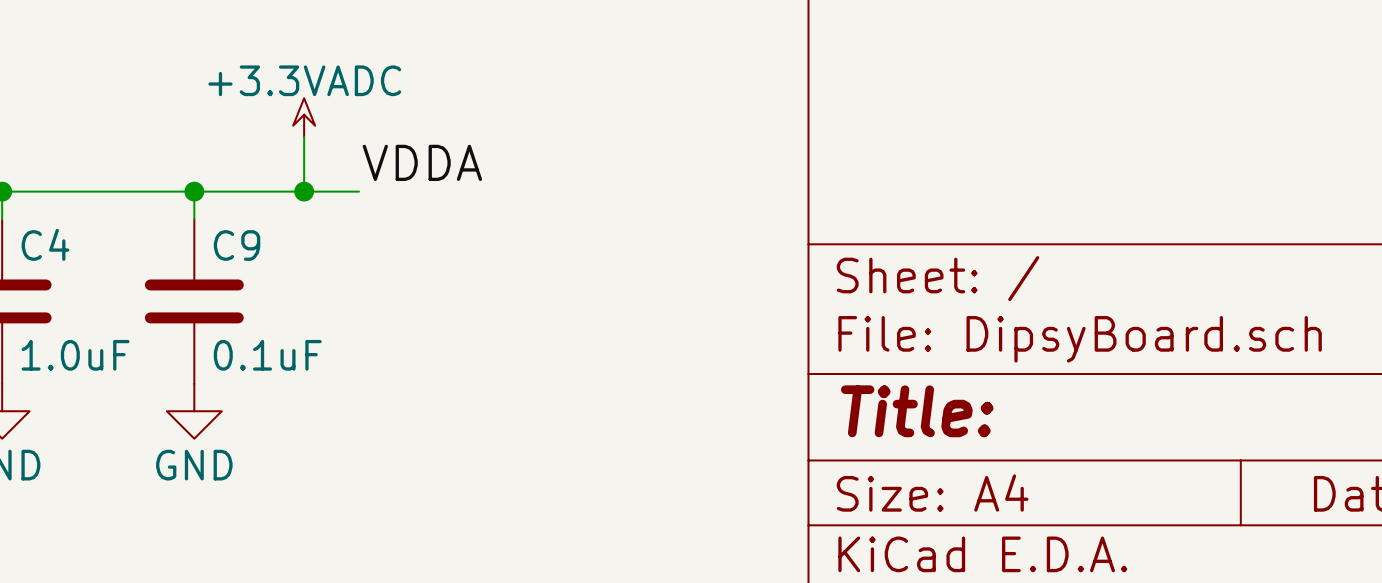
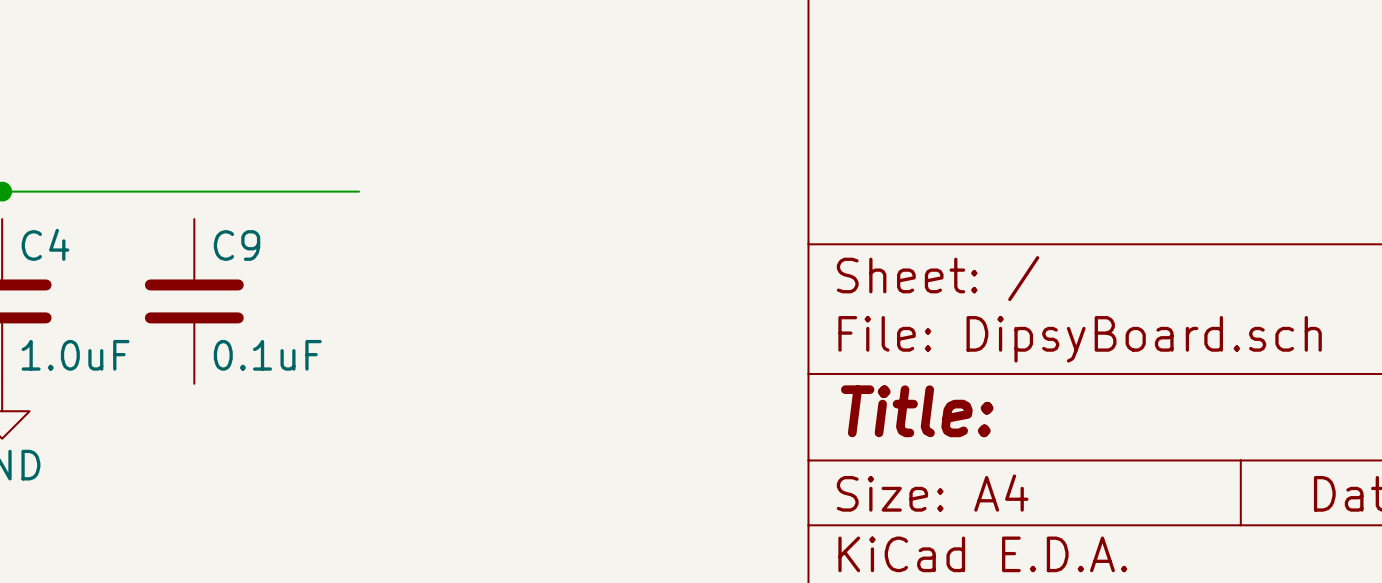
power symbol: +3.3VADC (304, 117) -> none
wire: (304, 136) (304, 191) -> none
label: VDDA (422, 162) -> none
wire: (2, 191) (2, 219) -> none
wire: (194, 191) (194, 219) -> none
junction: (194, 191) -> none
junction: (304, 191) -> none
power symbol: GND (194, 411) -> none

